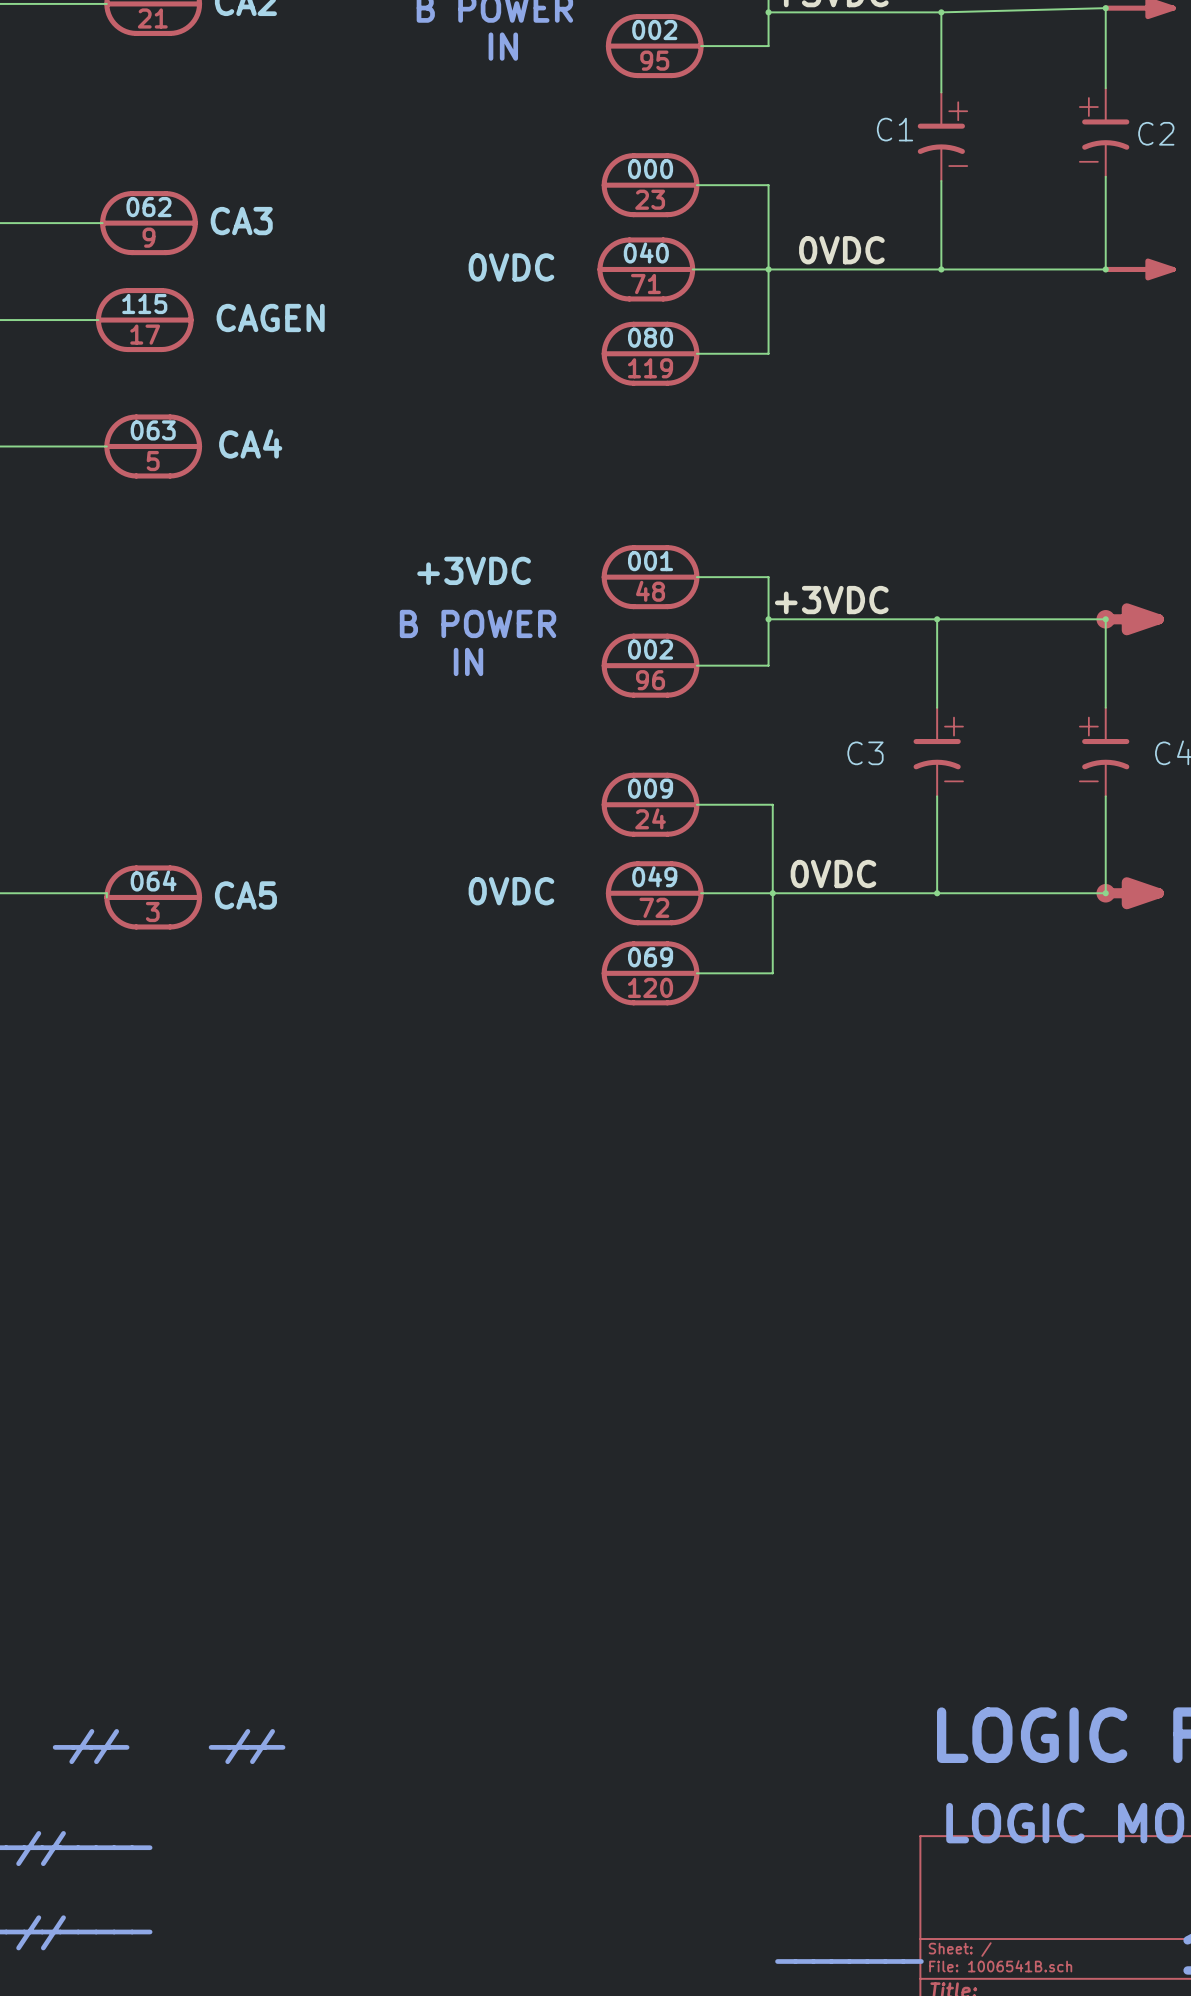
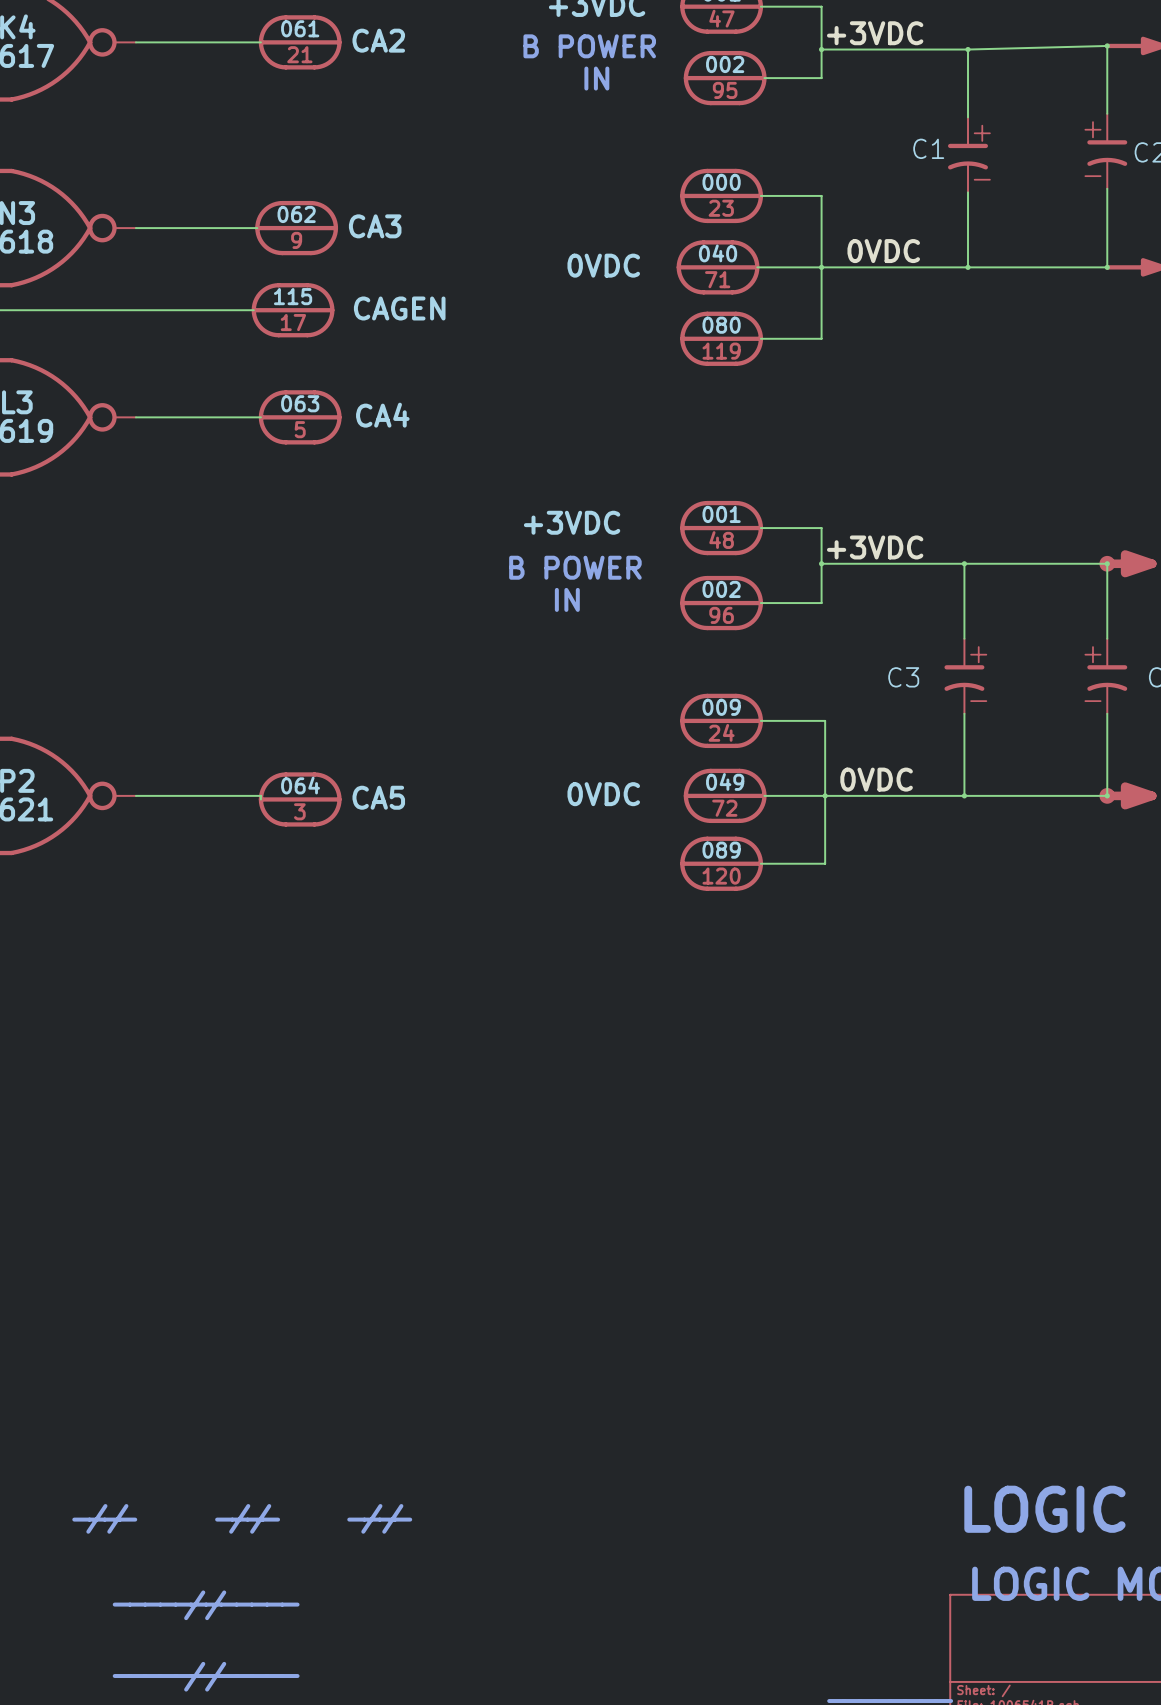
part text: 069 (650, 957) -> 089 (721, 850)

